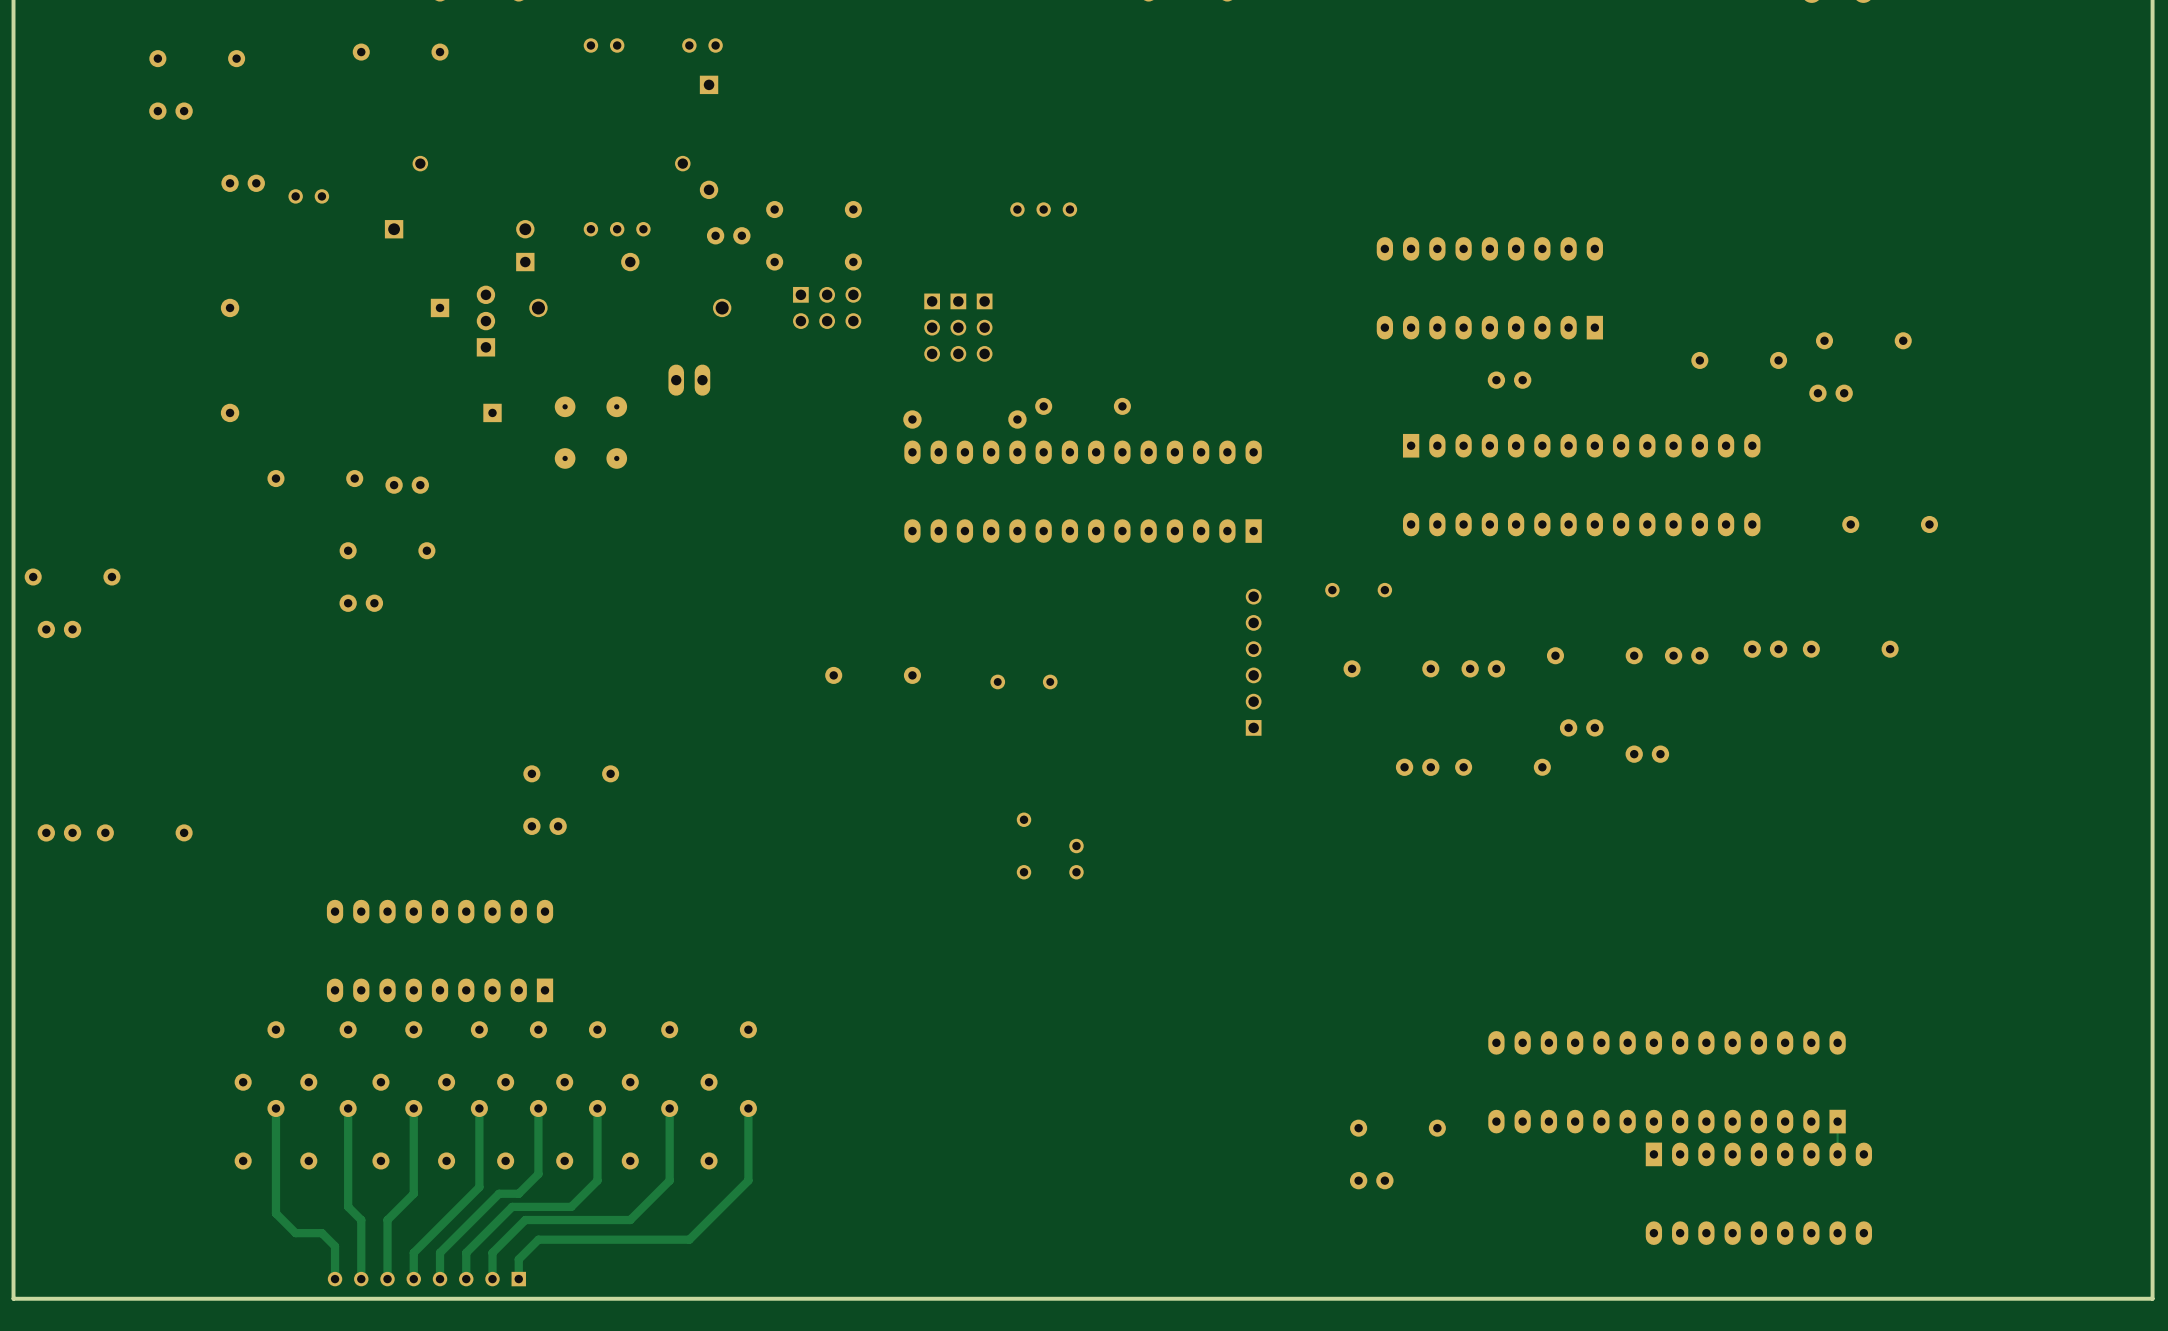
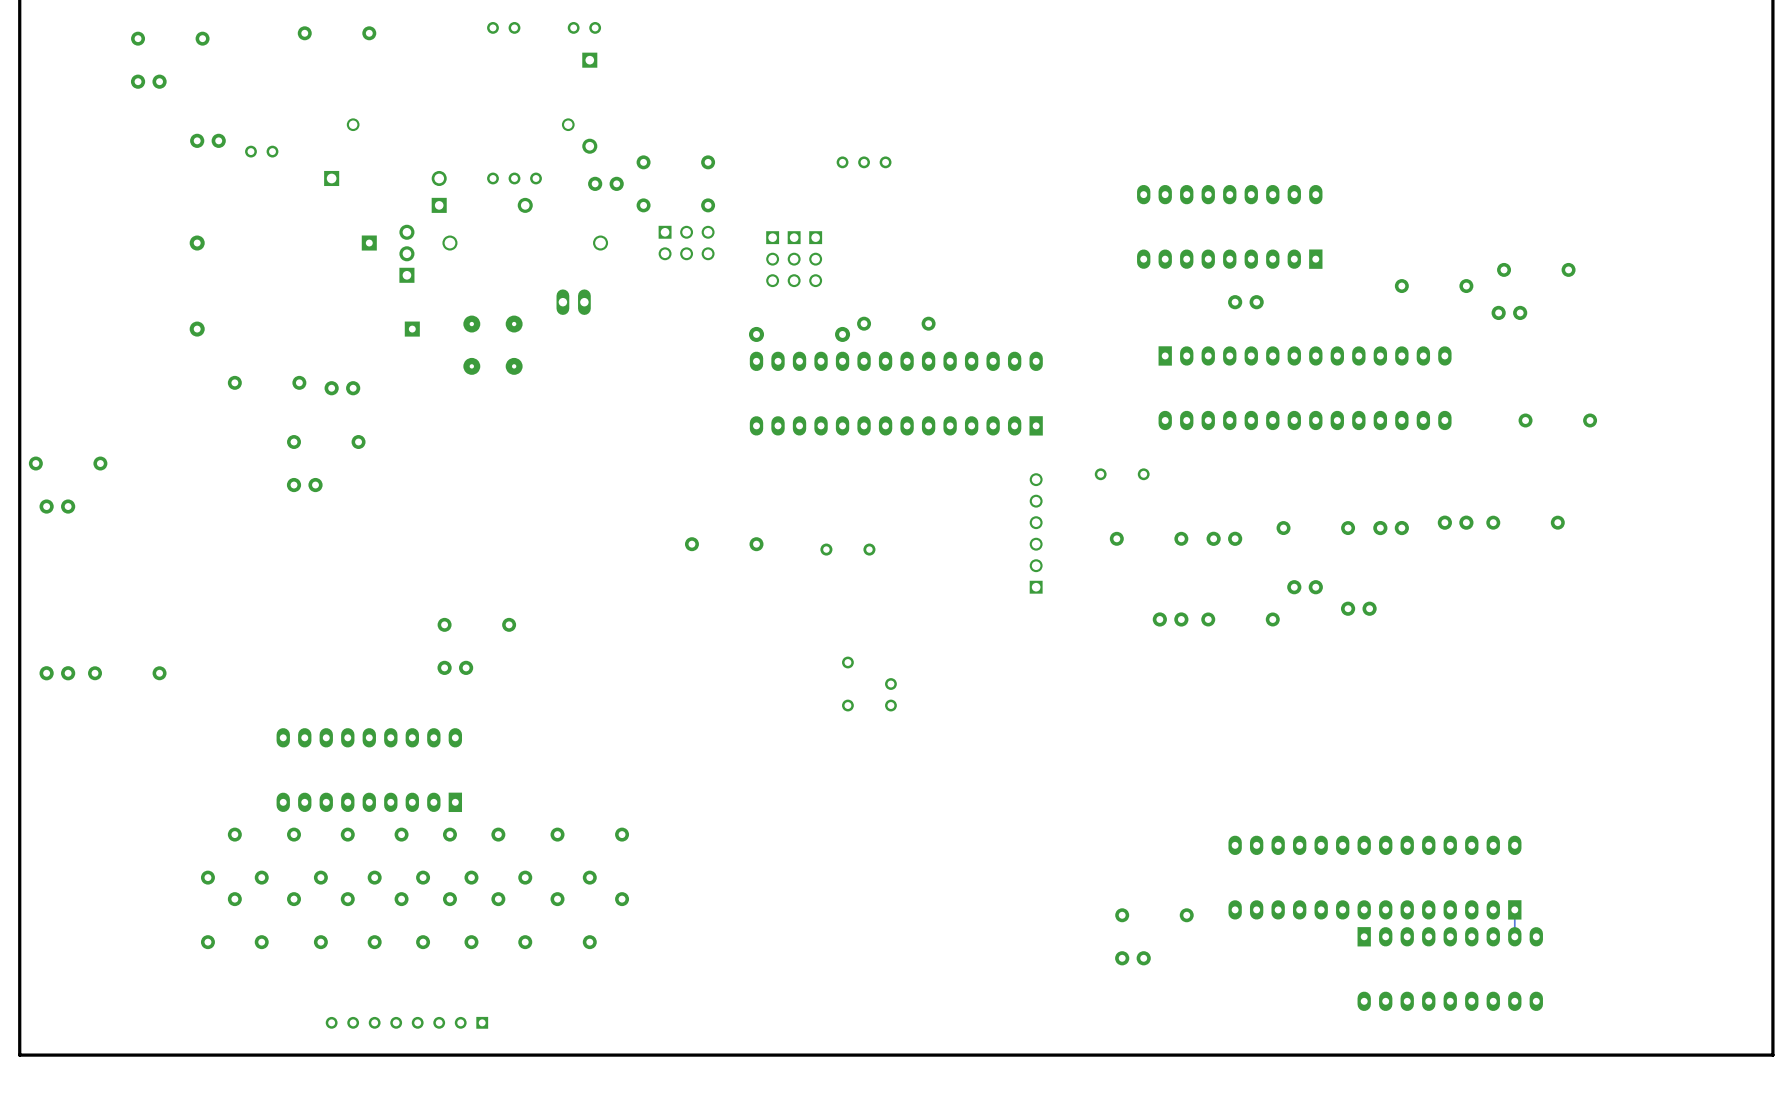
track: (275, 1108) (275, 1213) (295, 1233) (321, 1233) (335, 1246) (335, 1279) -> none
track: (348, 1108) (348, 1206) (361, 1220) (361, 1279) -> none
track: (413, 1108) (413, 1193) (387, 1220) (387, 1279) -> none
track: (479, 1108) (479, 1187) (413, 1252) (413, 1279) -> none
track: (538, 1108) (538, 1174) (518, 1193) (499, 1193) (440, 1252) (440, 1279) -> none
track: (597, 1108) (597, 1180) (571, 1206) (512, 1206) (466, 1252) (466, 1279) -> none
track: (669, 1108) (669, 1180) (630, 1220) (525, 1220) (492, 1252) (492, 1279) -> none
track: (748, 1108) (748, 1180) (689, 1239) (538, 1239) (518, 1259) (518, 1279) -> none
part position: (426, 1279) -> (406, 1022)

